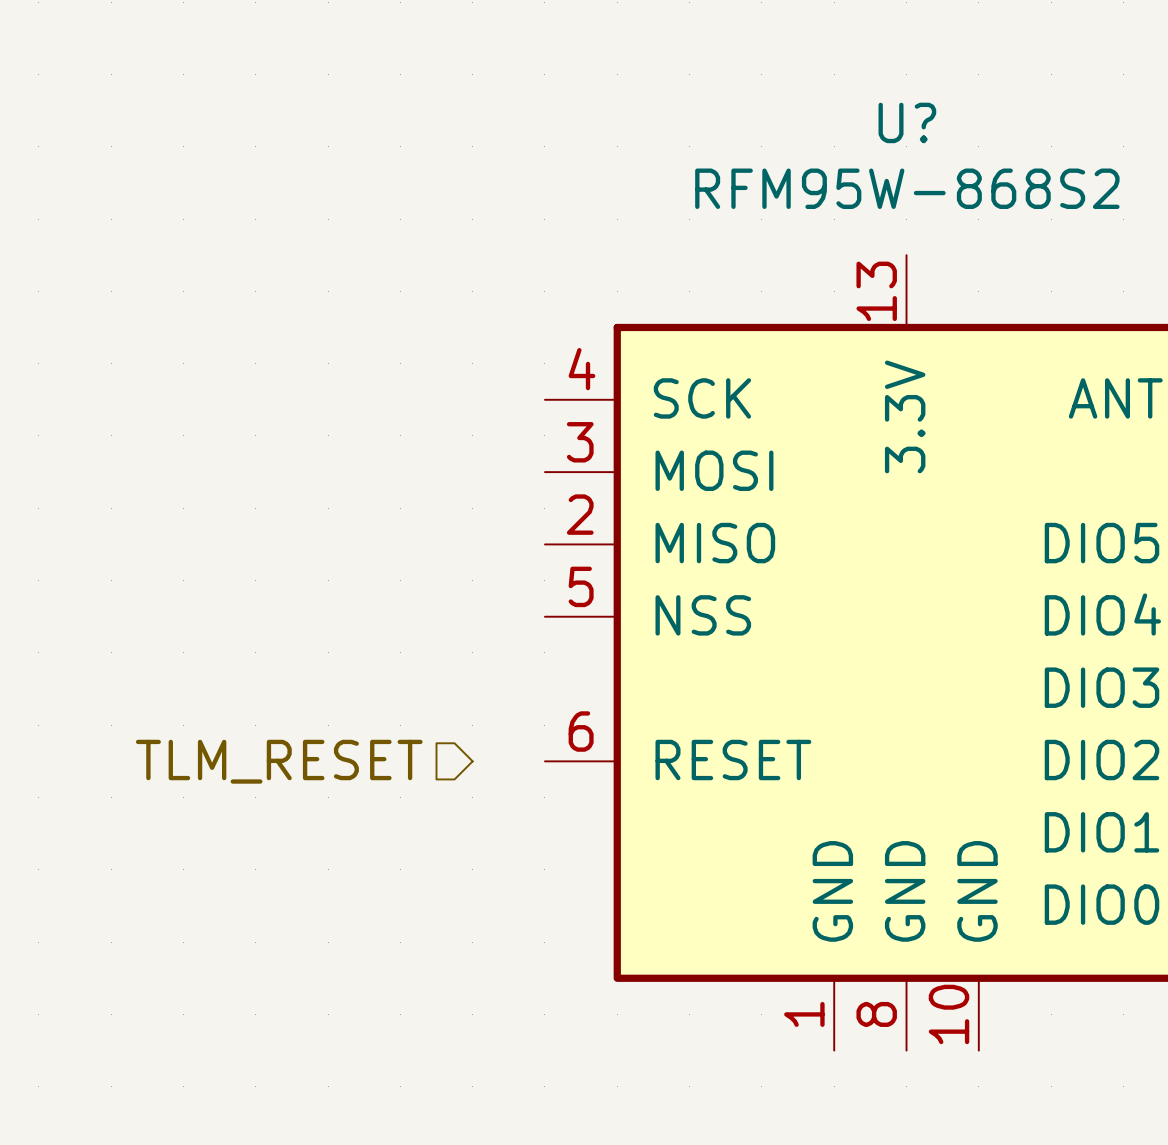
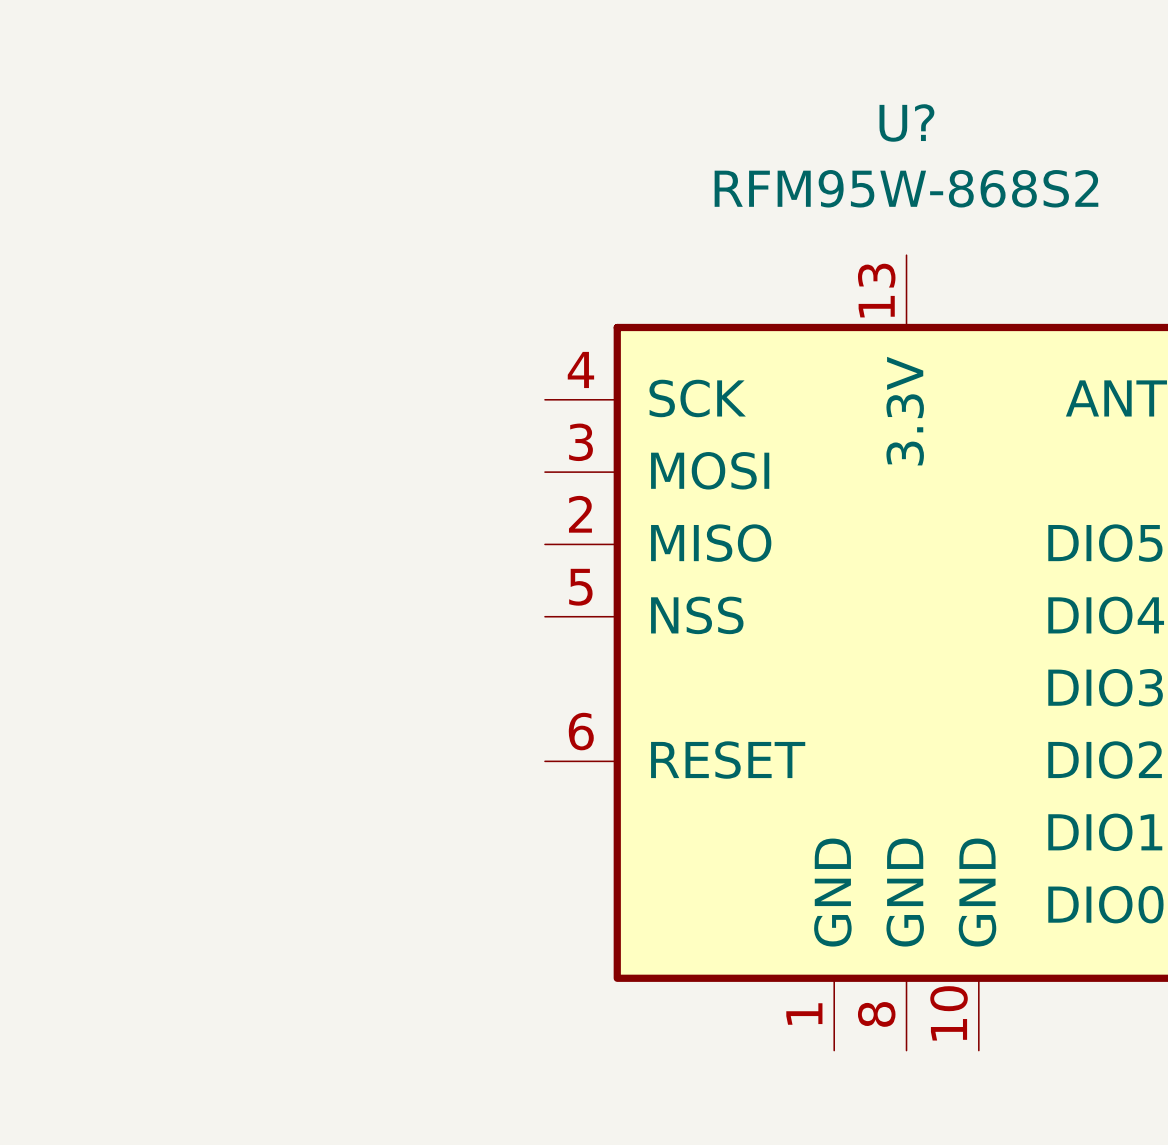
hierarchical label: TLM_RESET (279, 761) -> none

